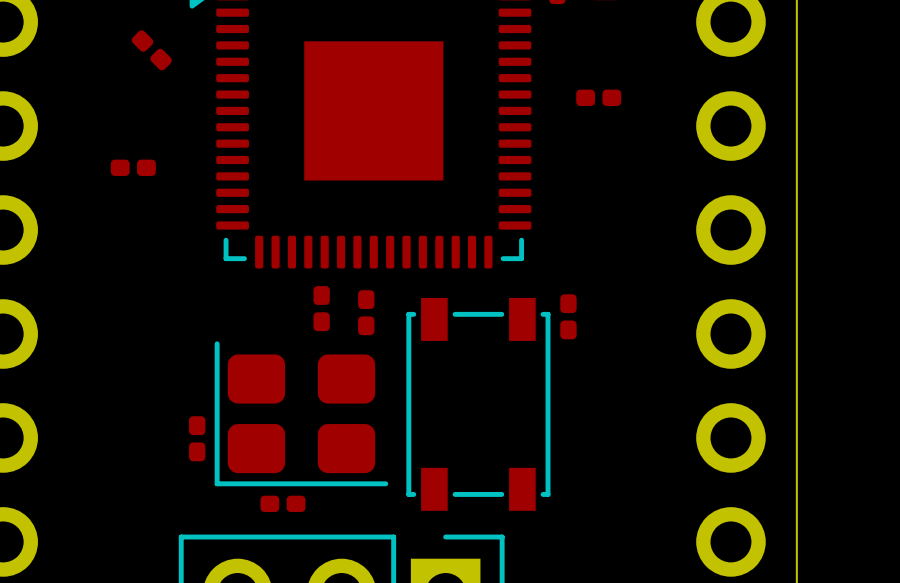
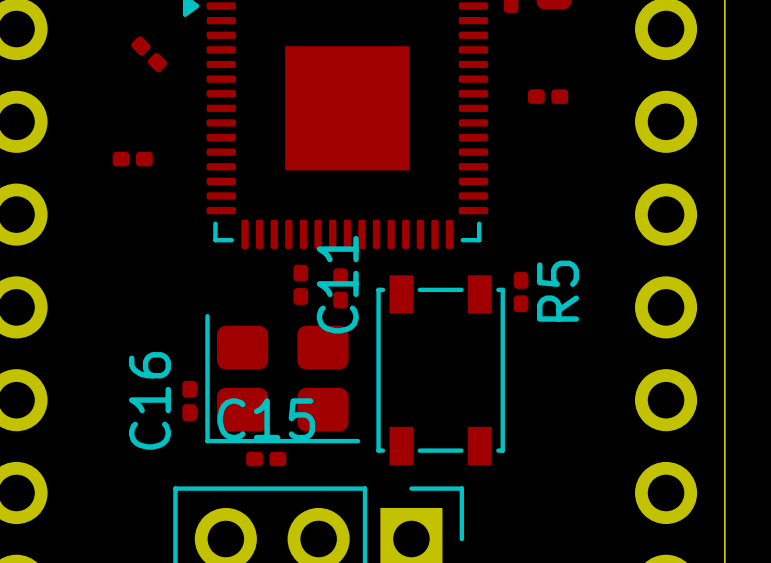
C11 name: none -> C11 (337, 284)
R5 name: none -> R5 (558, 291)
C16 name: none -> C16 (149, 400)
C15 name: none -> C15 (266, 419)

